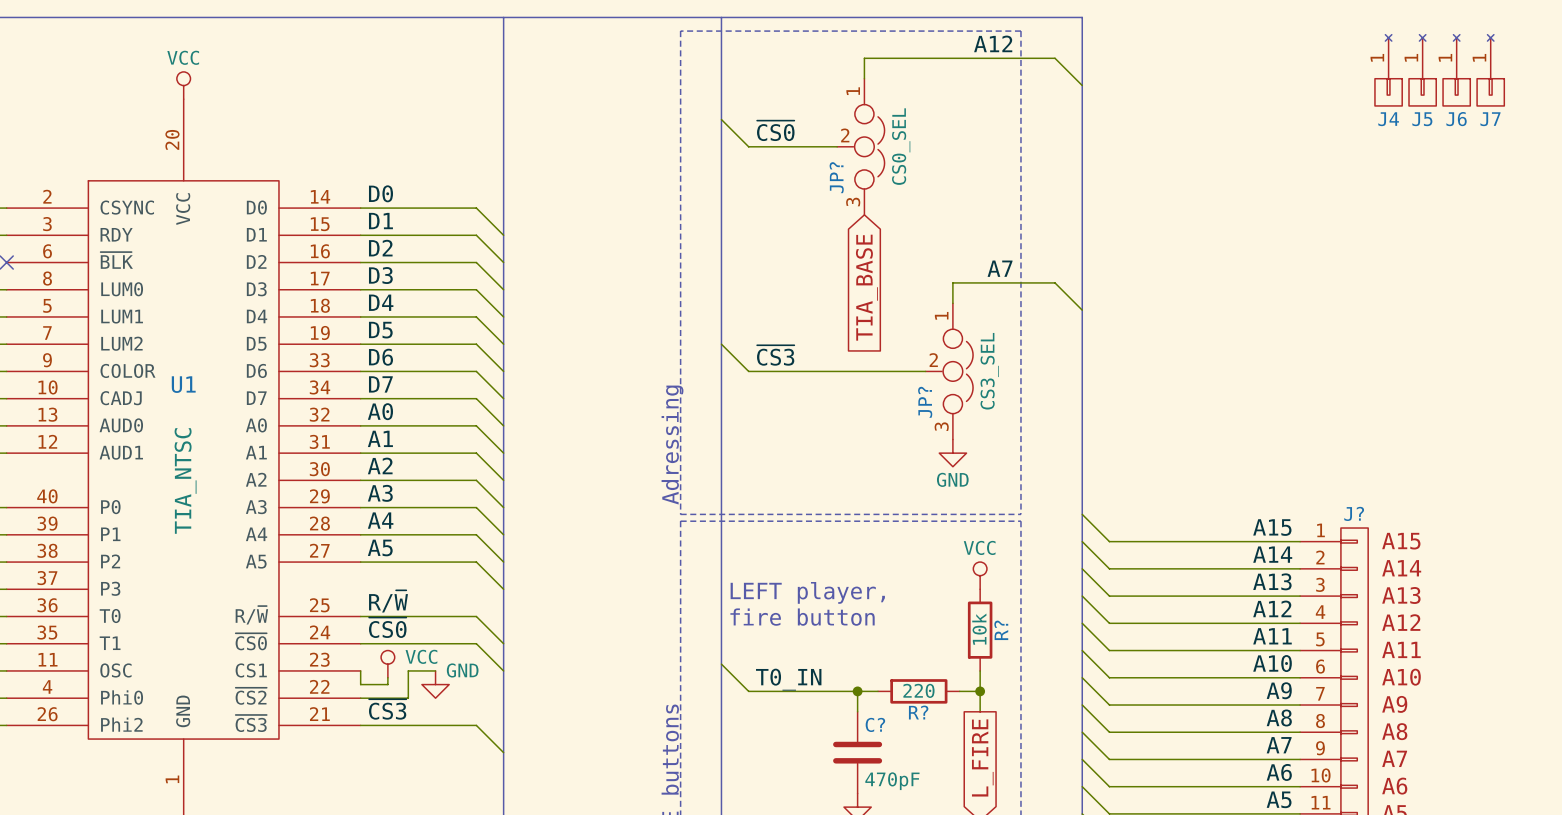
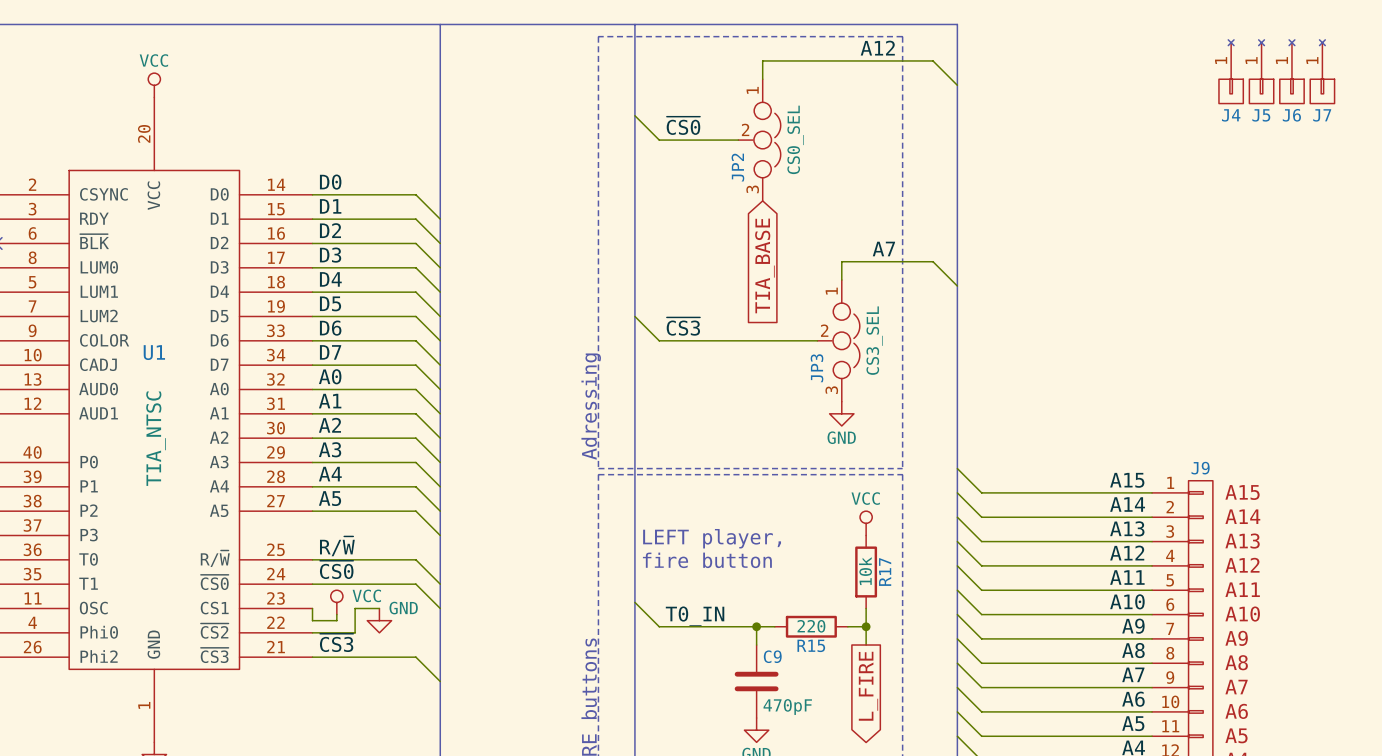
JP? name: JP? (836, 177) -> JP2 (737, 167)
JP? name: JP? (925, 402) -> JP3 (817, 368)
J? name: J? (1354, 513) -> J9 (1200, 468)
R? name: R? (1001, 630) -> R17 (885, 572)
R? name: R? (918, 712) -> R15 (811, 645)
C? name: C? (875, 724) -> C9 (772, 656)

